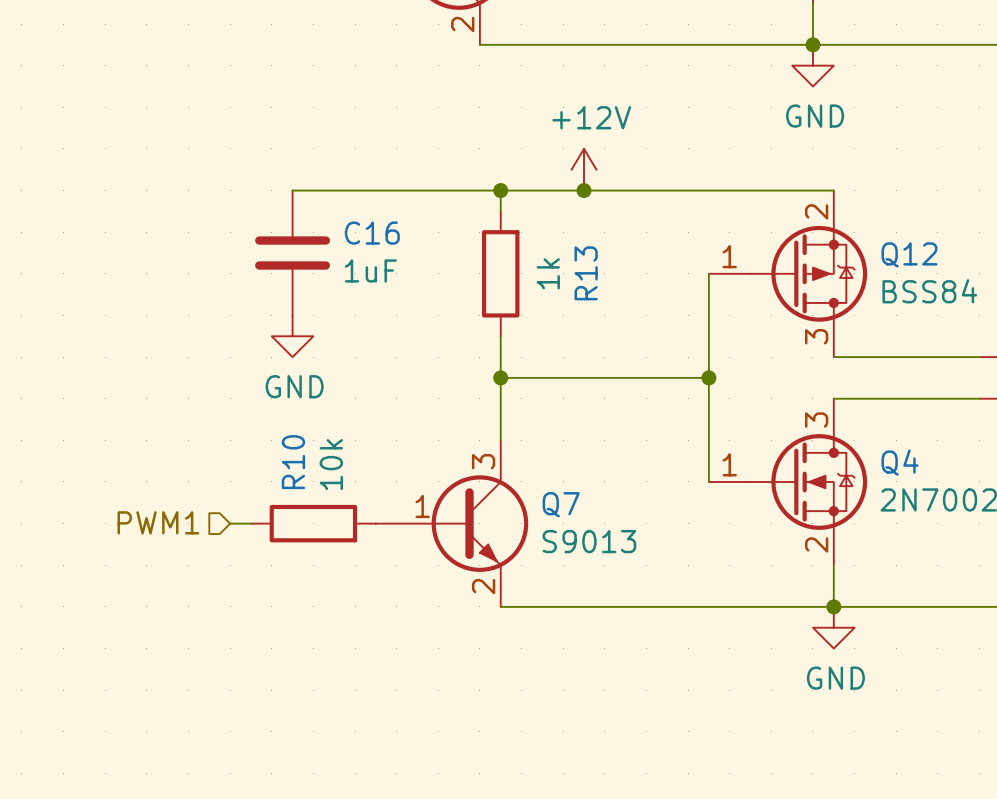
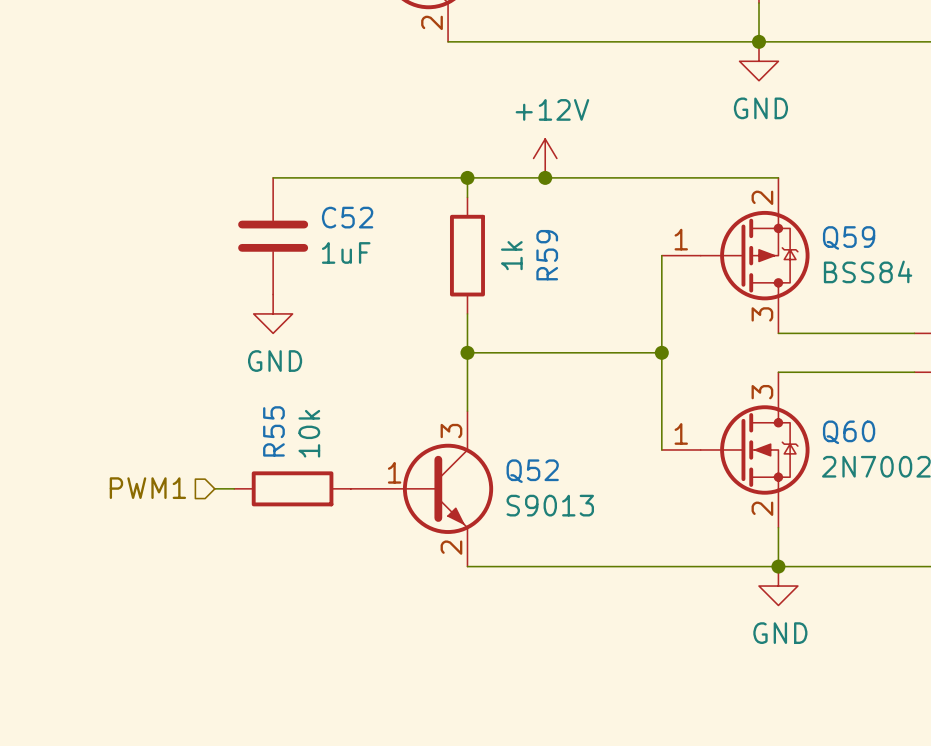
C16 name: C16 (372, 233) -> C52 (347, 217)
Q12 name: Q12 (909, 254) -> Q59 (849, 237)
R13 name: R13 (586, 273) -> R59 (547, 255)
R10 name: R10 (293, 462) -> R55 (273, 431)
Q4 name: Q4 (900, 462) -> Q60 (849, 432)
Q7 name: Q7 (561, 504) -> Q52 (532, 471)

